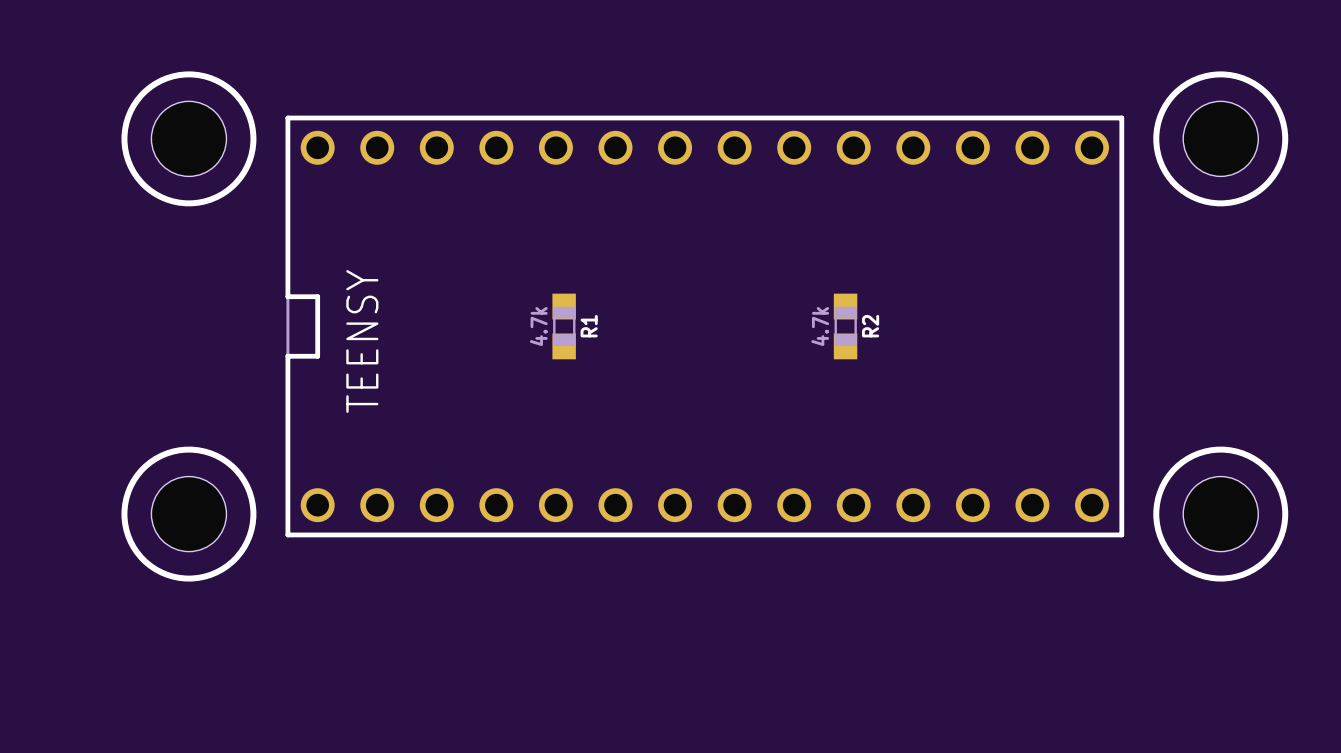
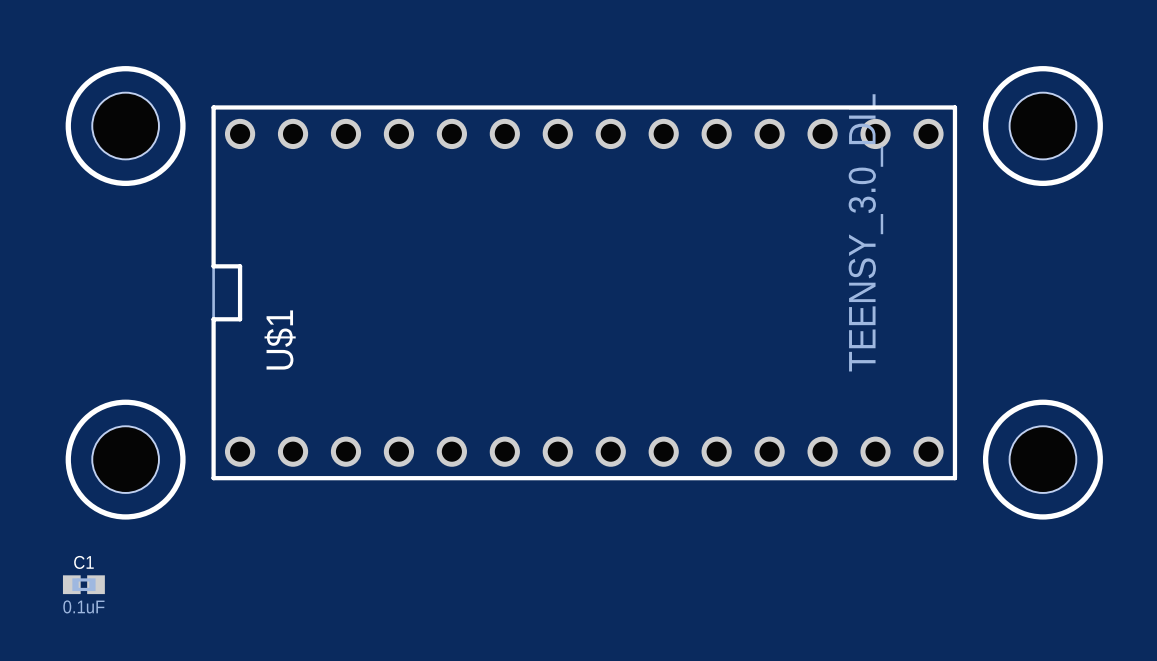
TEENSY value: none -> TEENSY_3.0_DIL (865, 232)
R1: 4.7k (564, 326) -> none
R2: 4.7k (845, 326) -> none
TEENSY name: TEENSY (362, 341) -> U$1 (280, 339)
C1: none -> 0.1uF (83, 584)

